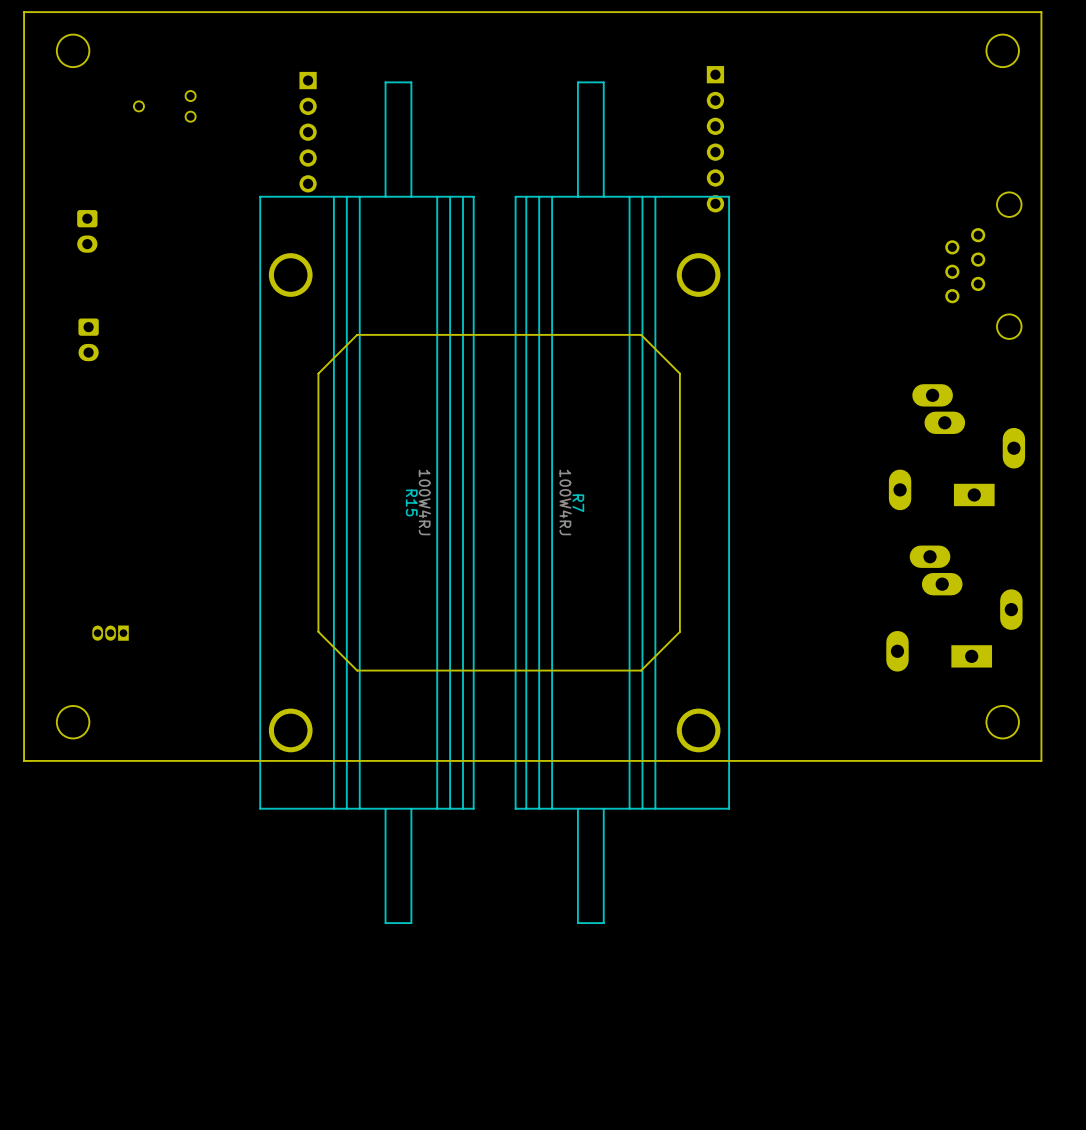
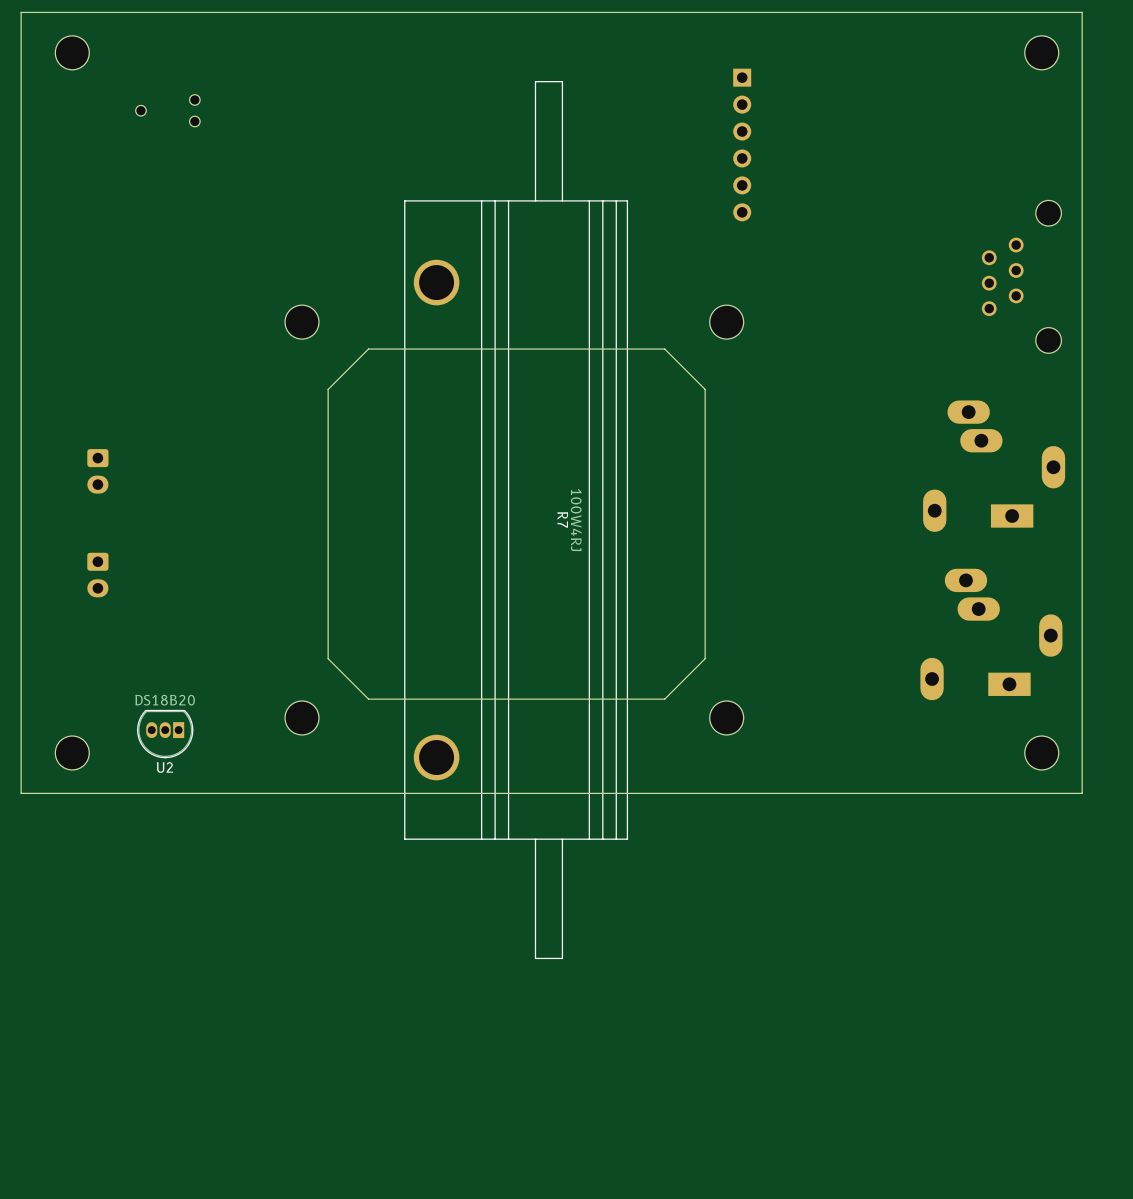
part: (308, 132) -> none
part: (87, 231) -> none
part: none -> (302, 322)
part: none -> (726, 322)
part: (88, 339) -> none
part: none -> (97, 471)
R15: 100W4RJ (366, 502) -> none
R7 rotation: 0° (622, 502) -> 180° (516, 520)
part: none -> (97, 575)
U2 side: top (110, 633) -> bottom (165, 734)
part: none -> (302, 717)
part: none -> (726, 717)

